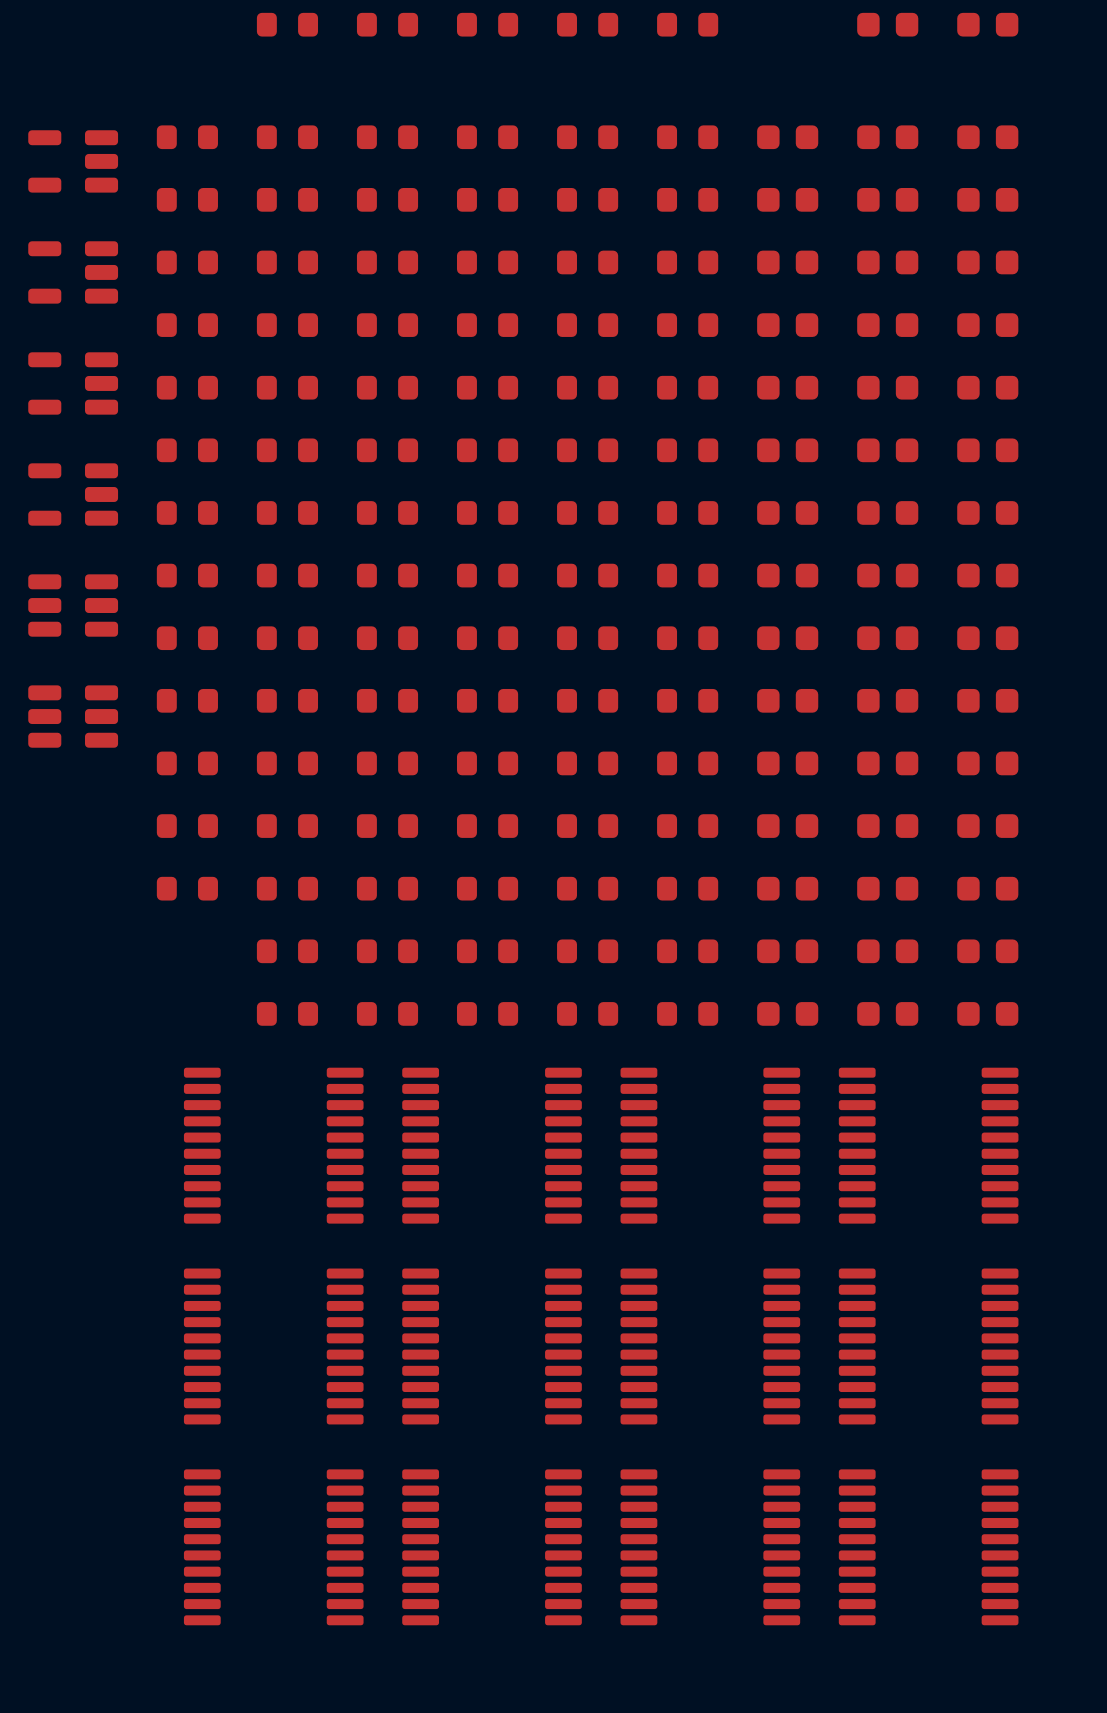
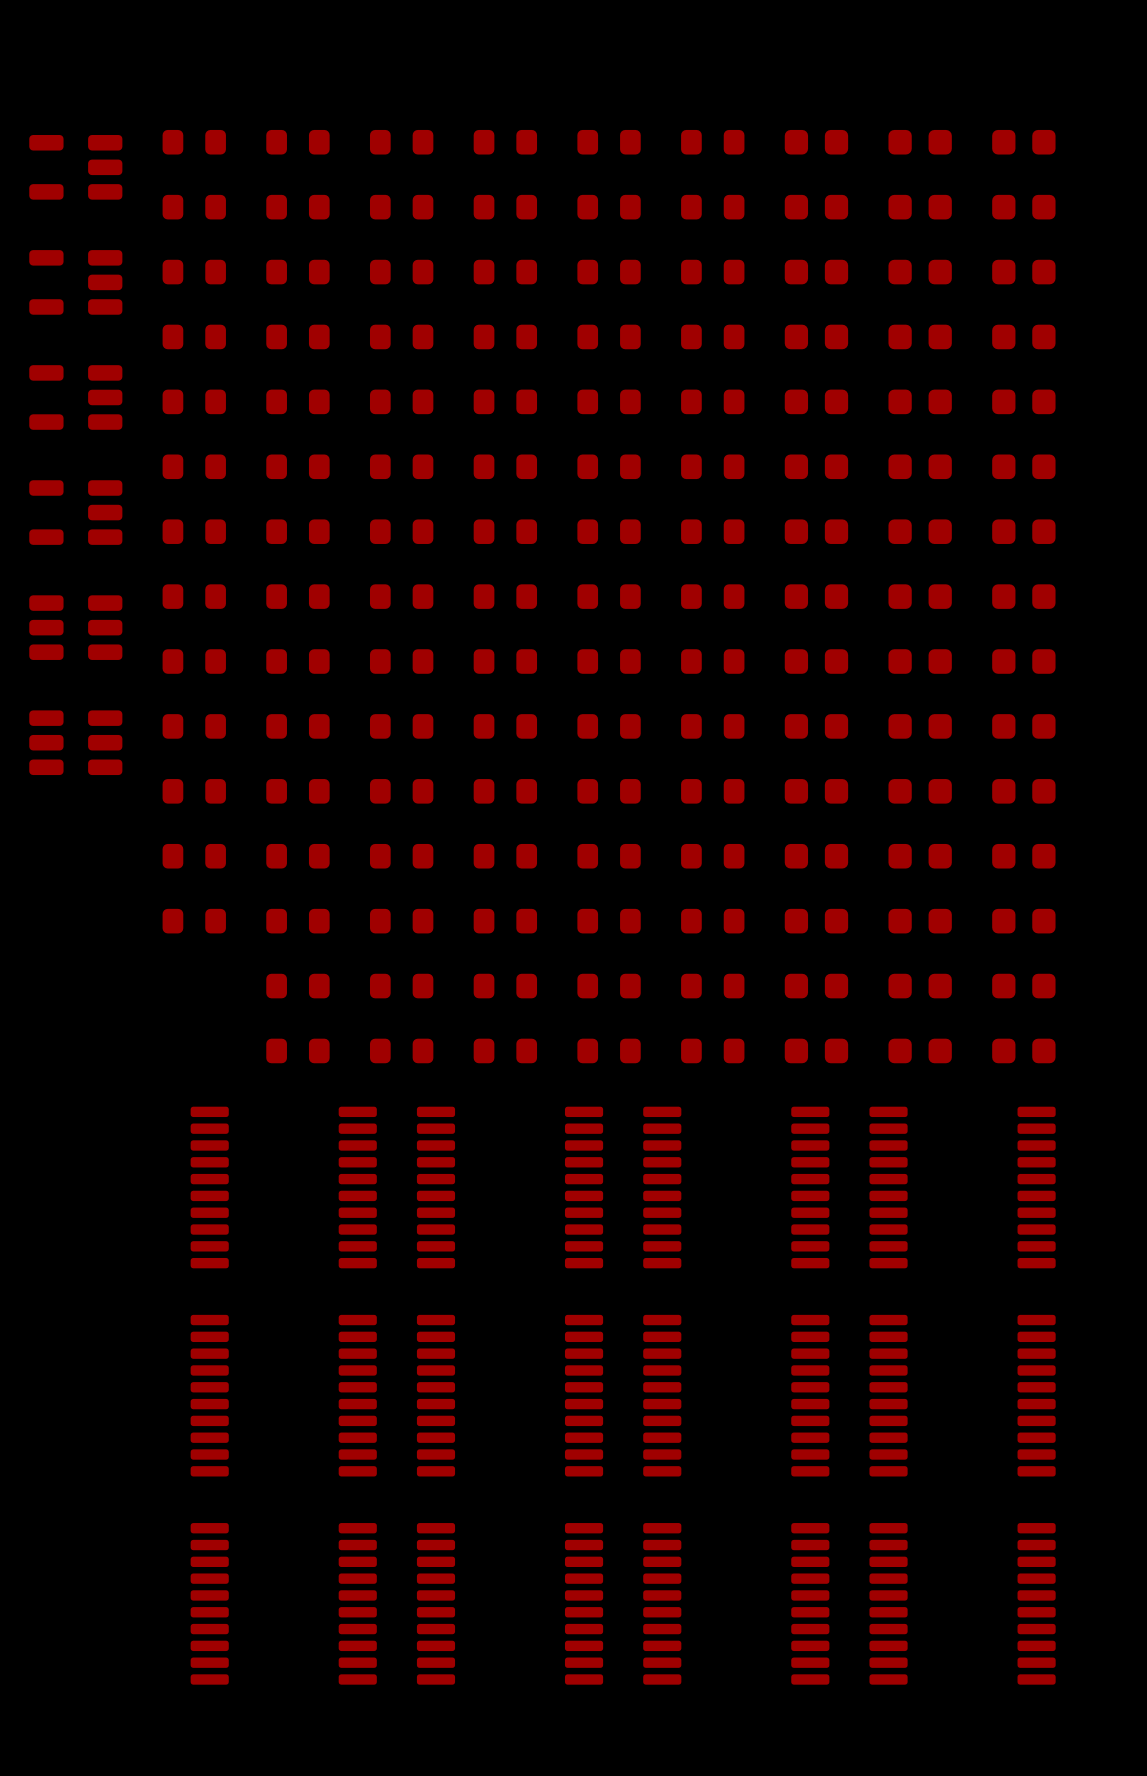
part: (287, 24) -> none
part: (387, 24) -> none
part: (487, 24) -> none
part: (587, 24) -> none
part: (687, 24) -> none
part: (887, 24) -> none
part: (987, 24) -> none

